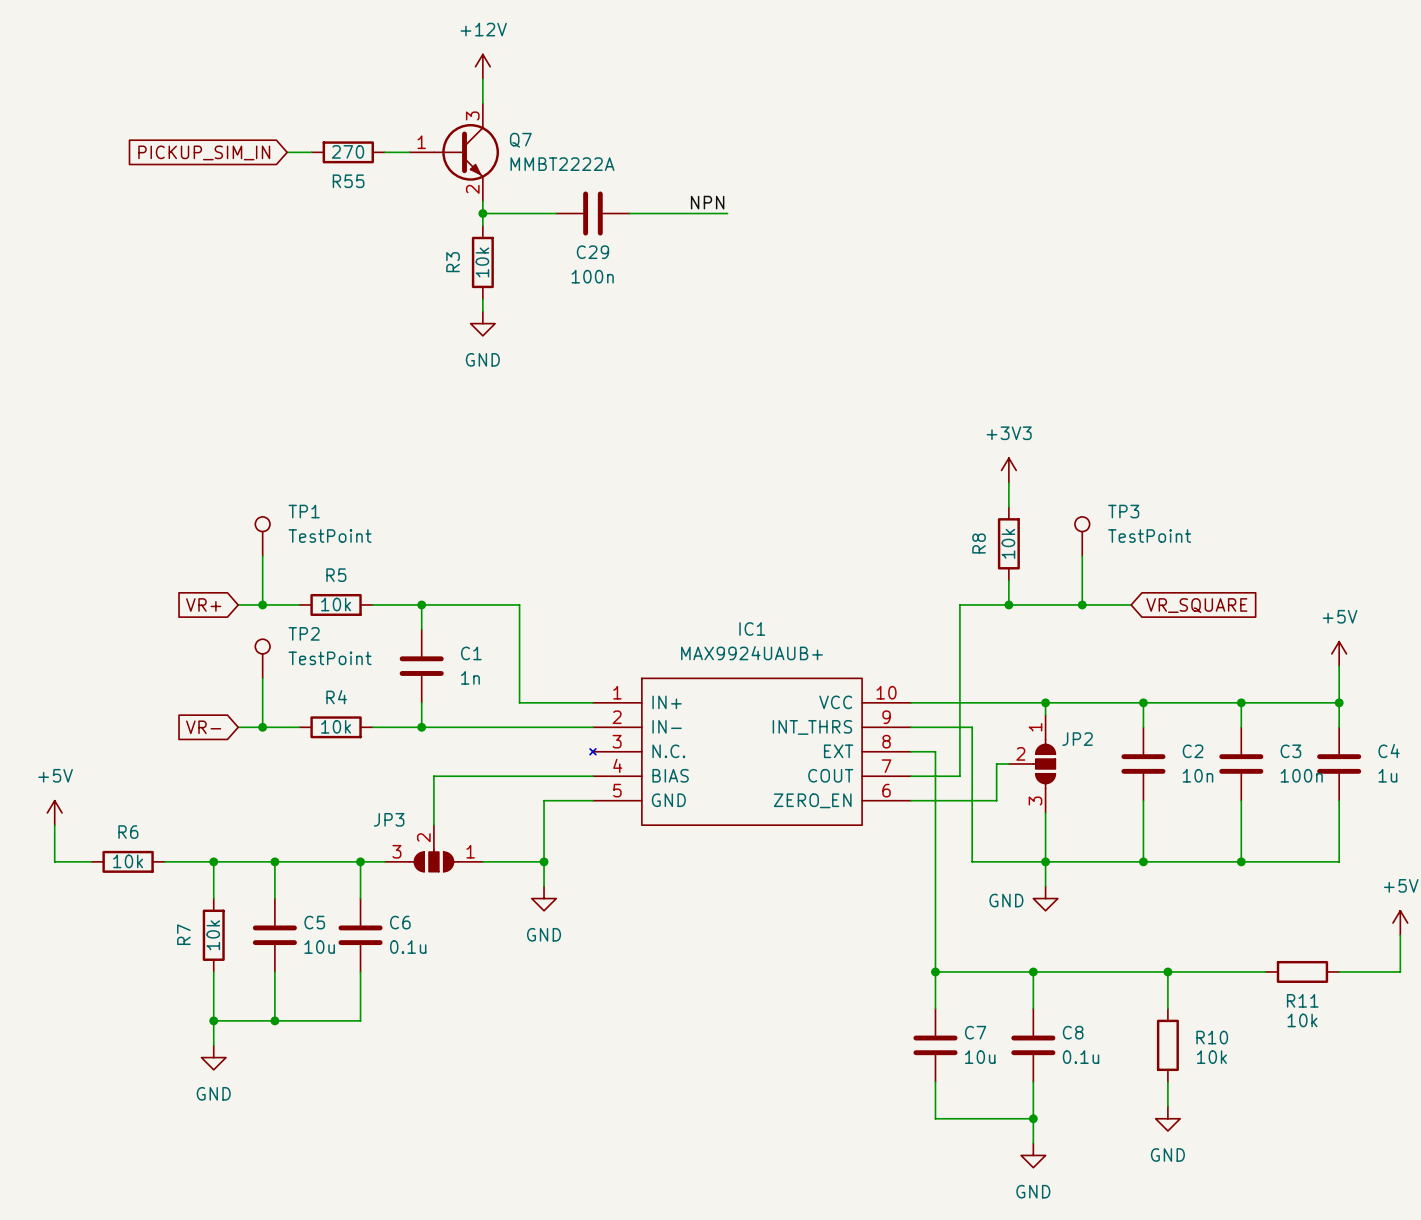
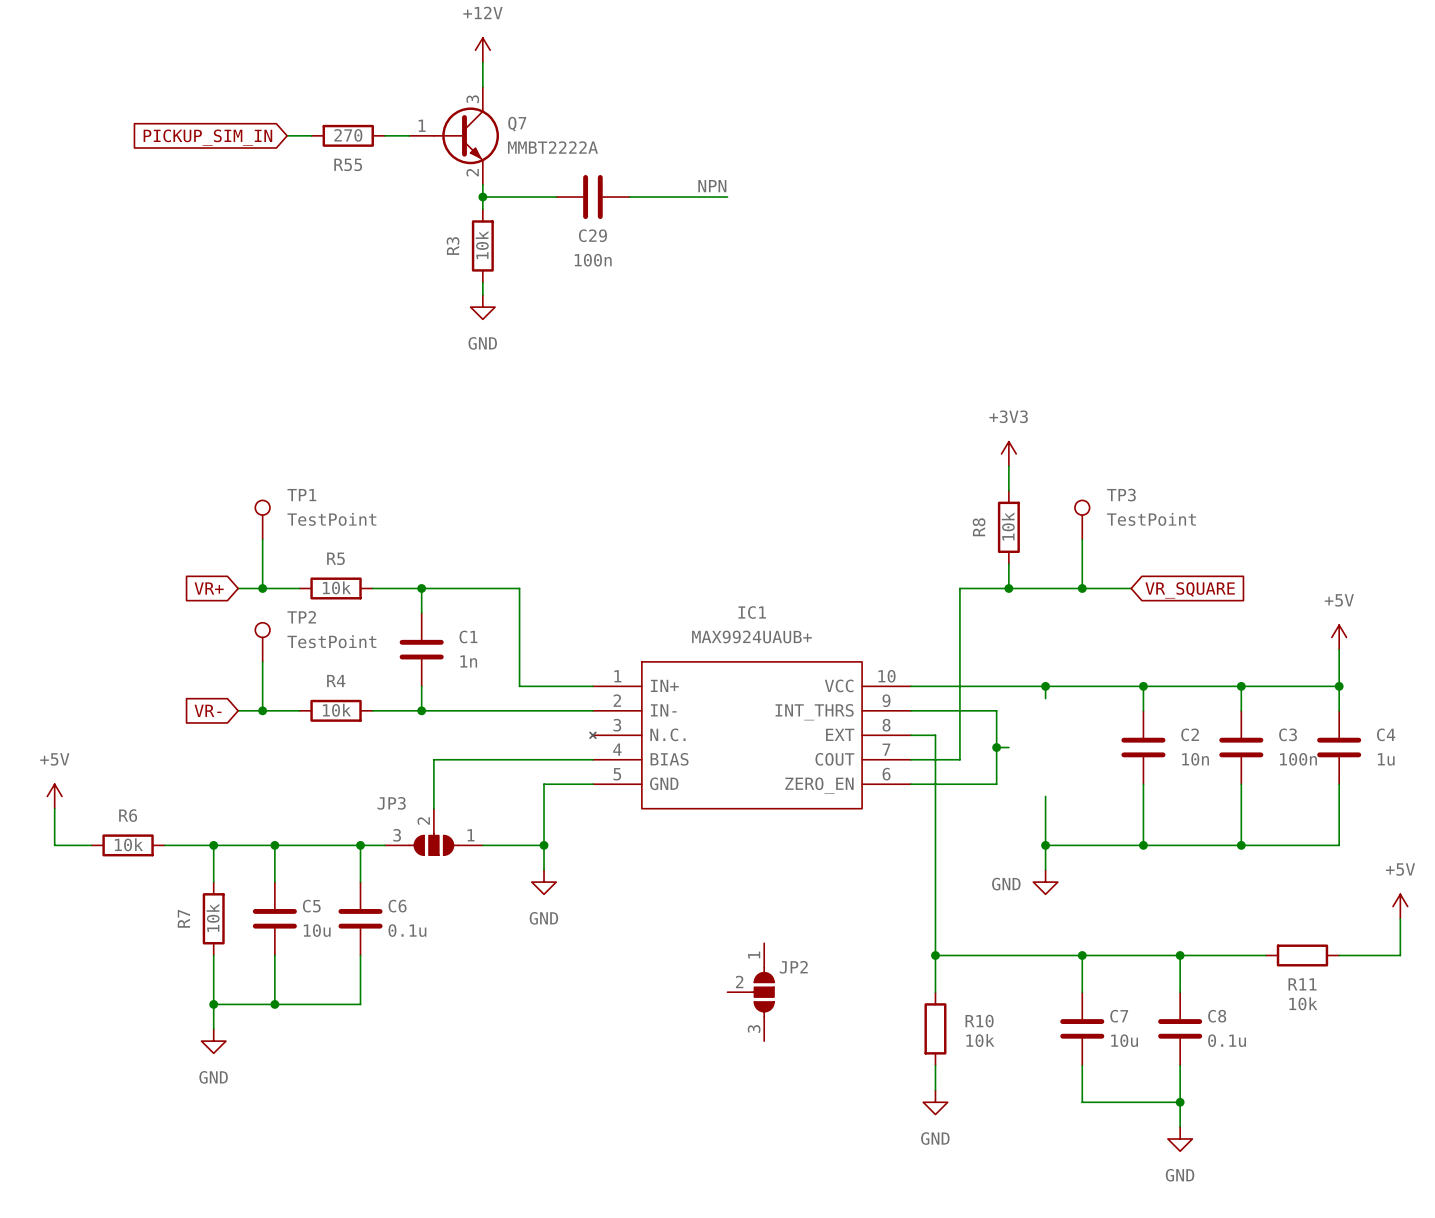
wire: (972, 727) (972, 861) (1045, 861) -> (972, 710) (996, 710) (996, 747)
junction: none -> (996, 747)
JP2 position: (1032, 764) -> (750, 992)
wire: (1033, 971) (1033, 1008) -> (1180, 955) (1180, 992)
junction: (1033, 971) -> none
junction: none -> (1082, 955)
wire: (1167, 971) (1167, 1008) -> (1082, 955) (1082, 992)
junction position: (1167, 971) -> (1180, 955)
C7 position: (935, 1045) -> (1082, 1028)
C8 position: (1033, 1045) -> (1180, 1028)
R10 position: (1167, 1045) -> (935, 1028)
wire: (1033, 1082) (1033, 1143) -> (1180, 1065) (1180, 1126)
wire: none -> (1082, 1065) (1082, 1102) (1180, 1102)
wire: (1167, 1082) (1167, 1106) -> none
wire: (935, 1106) (935, 1118) (1033, 1118) -> none
power symbol: none -> GND (935, 1102)
junction: (1033, 1118) -> none
power symbol position: GND (1167, 1118) -> GND (1180, 1138)
junction: none -> (1180, 1102)
power symbol: GND (1033, 1155) -> none

